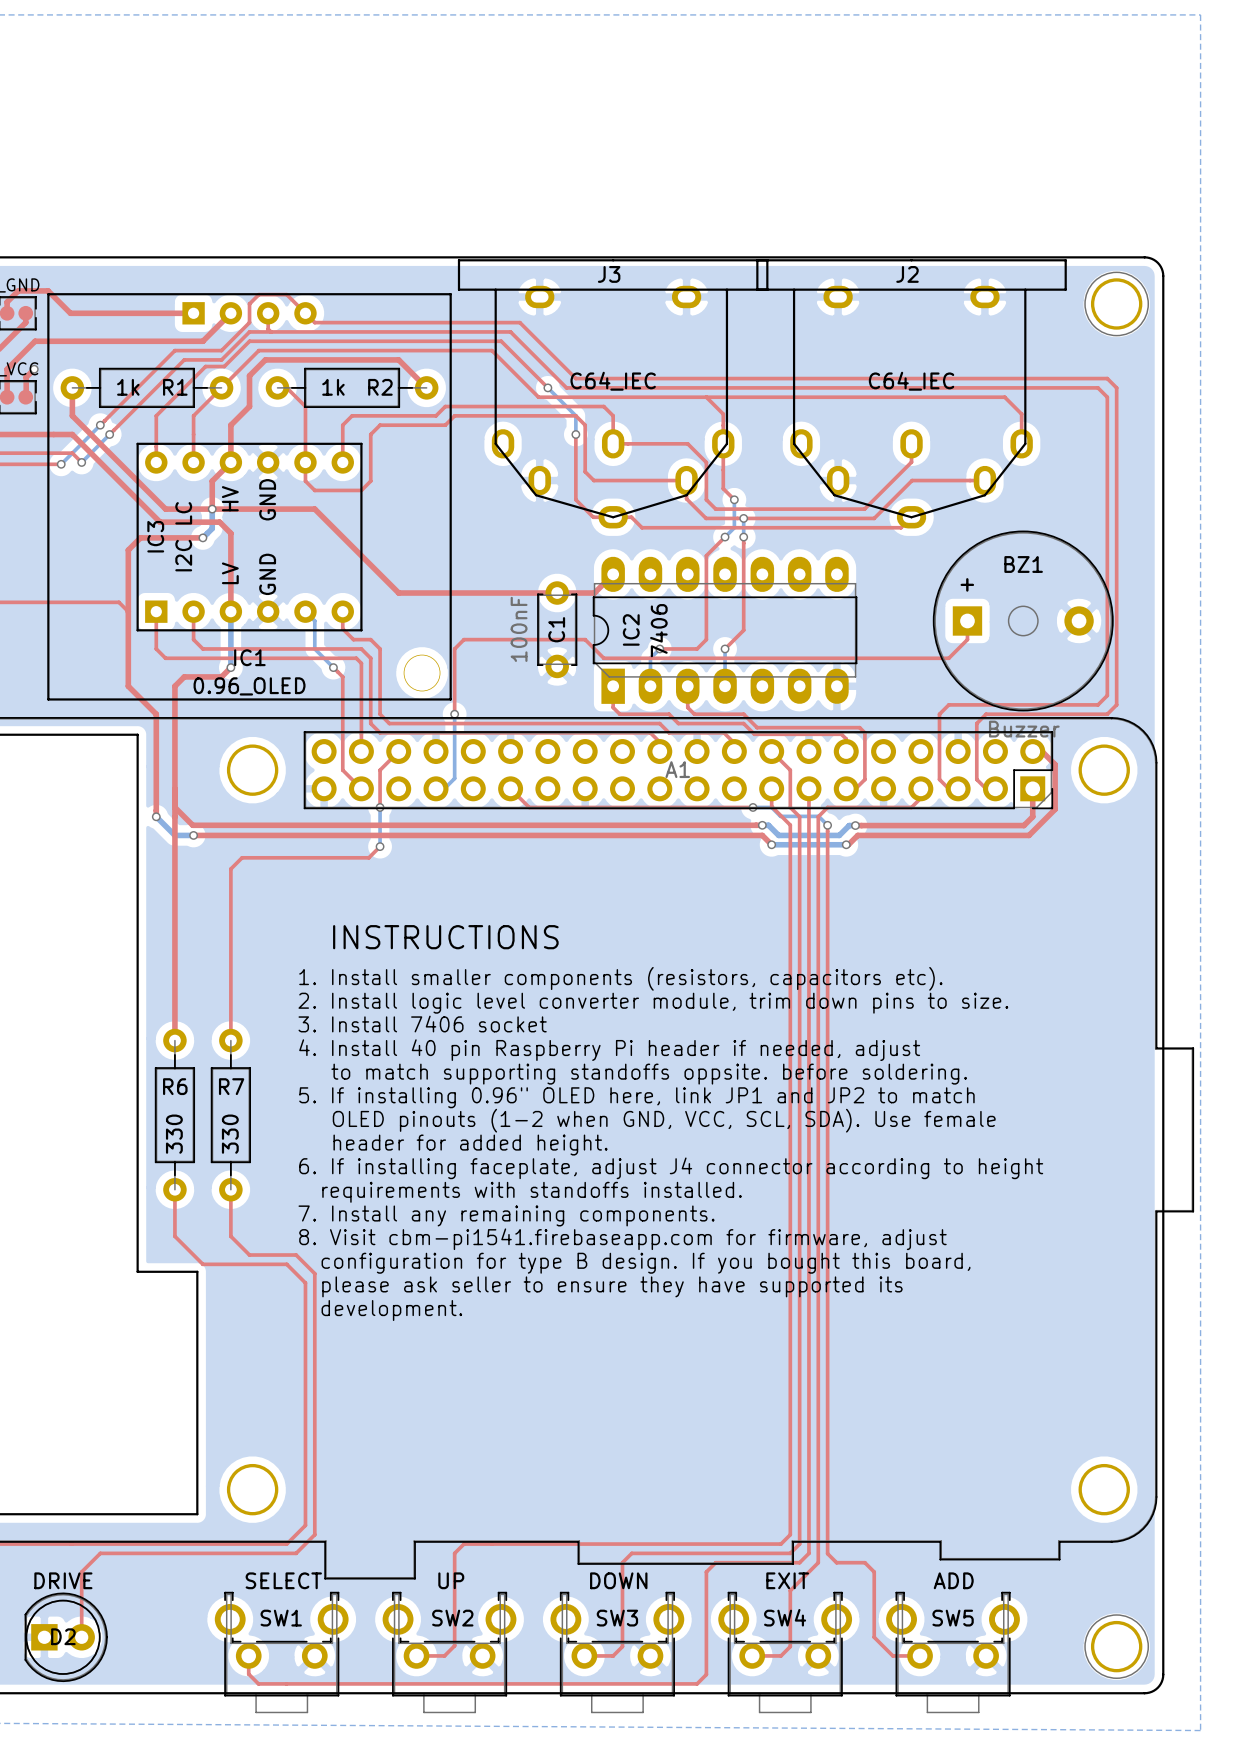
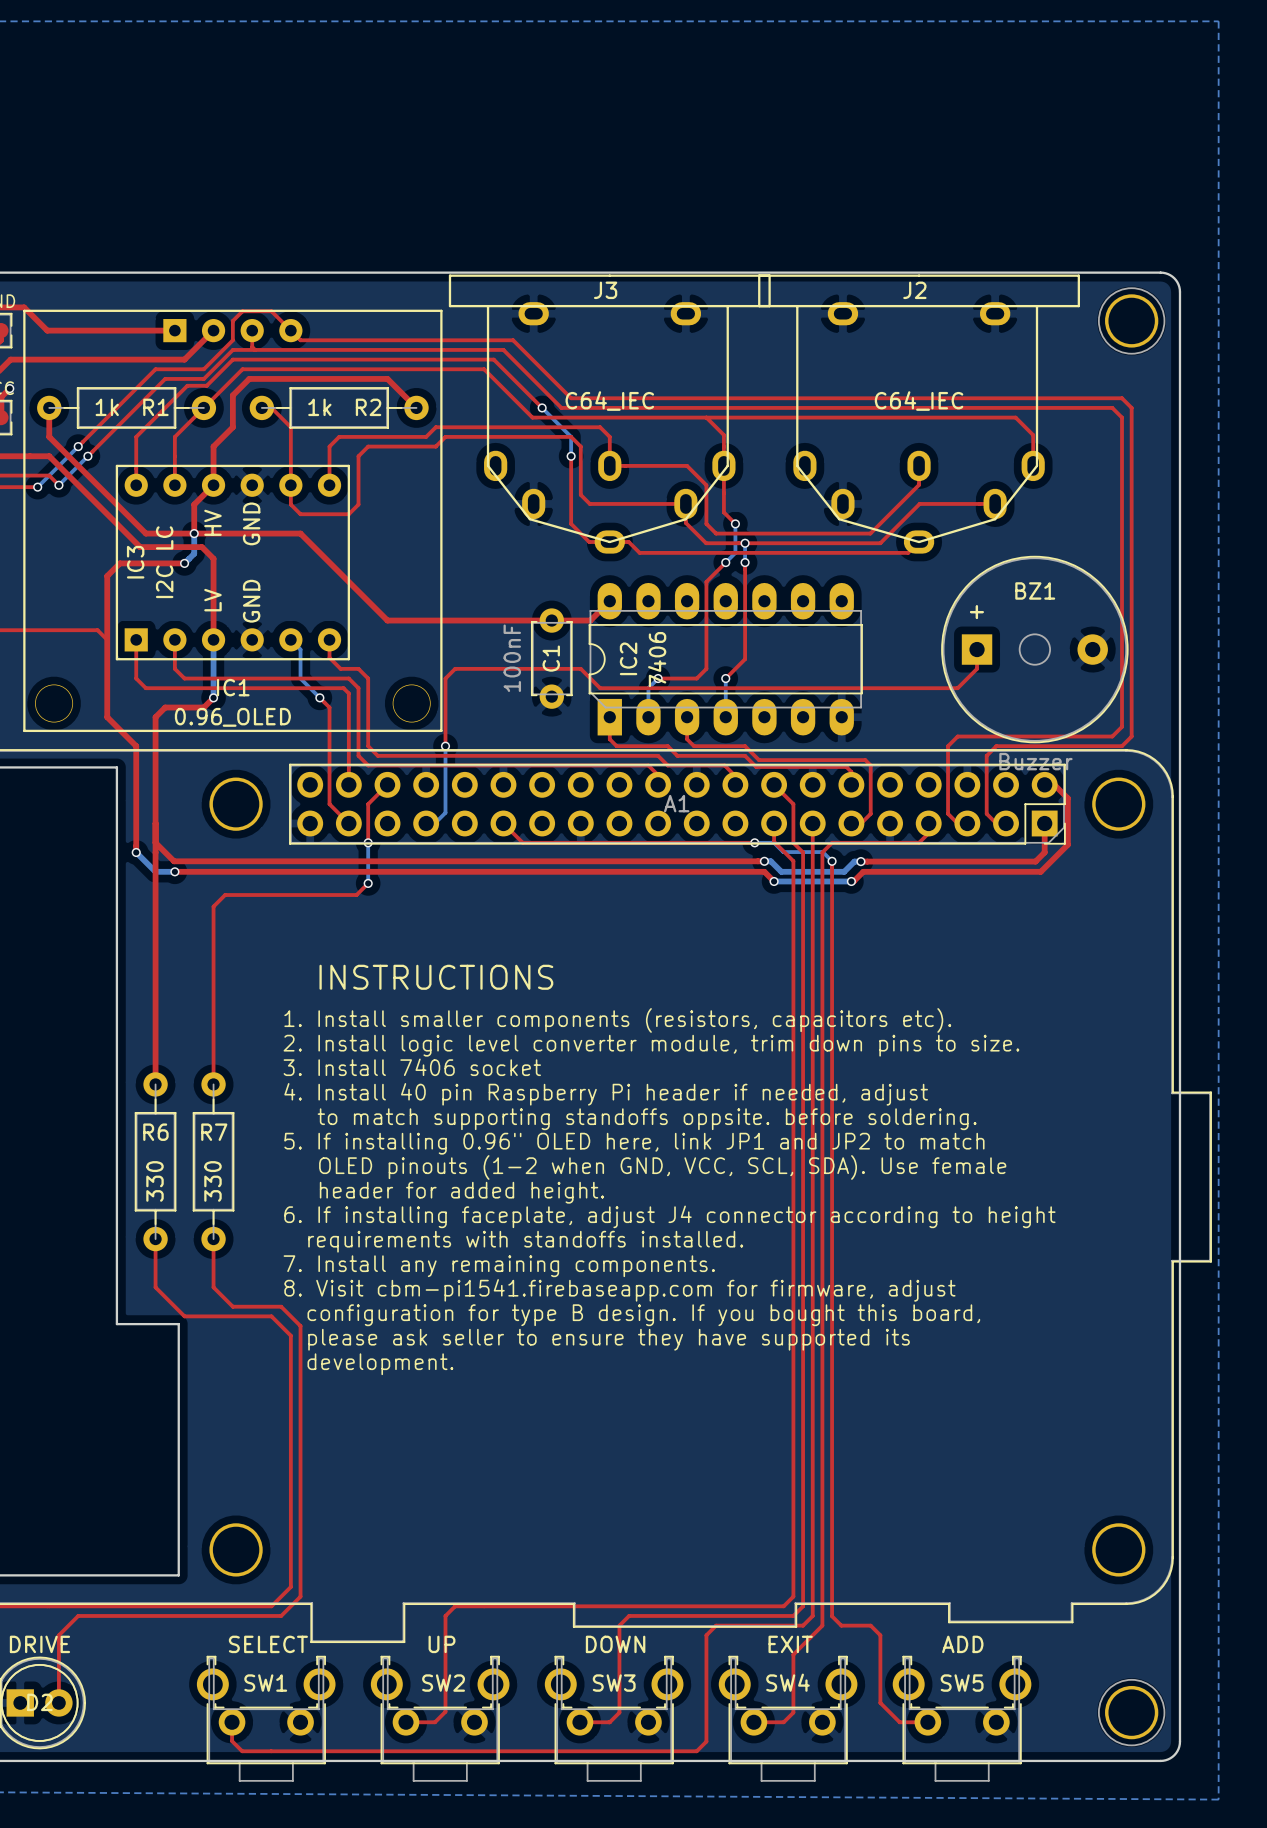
IC1 footprint: [47, 293, 452, 701] -> [23, 309, 443, 733]

